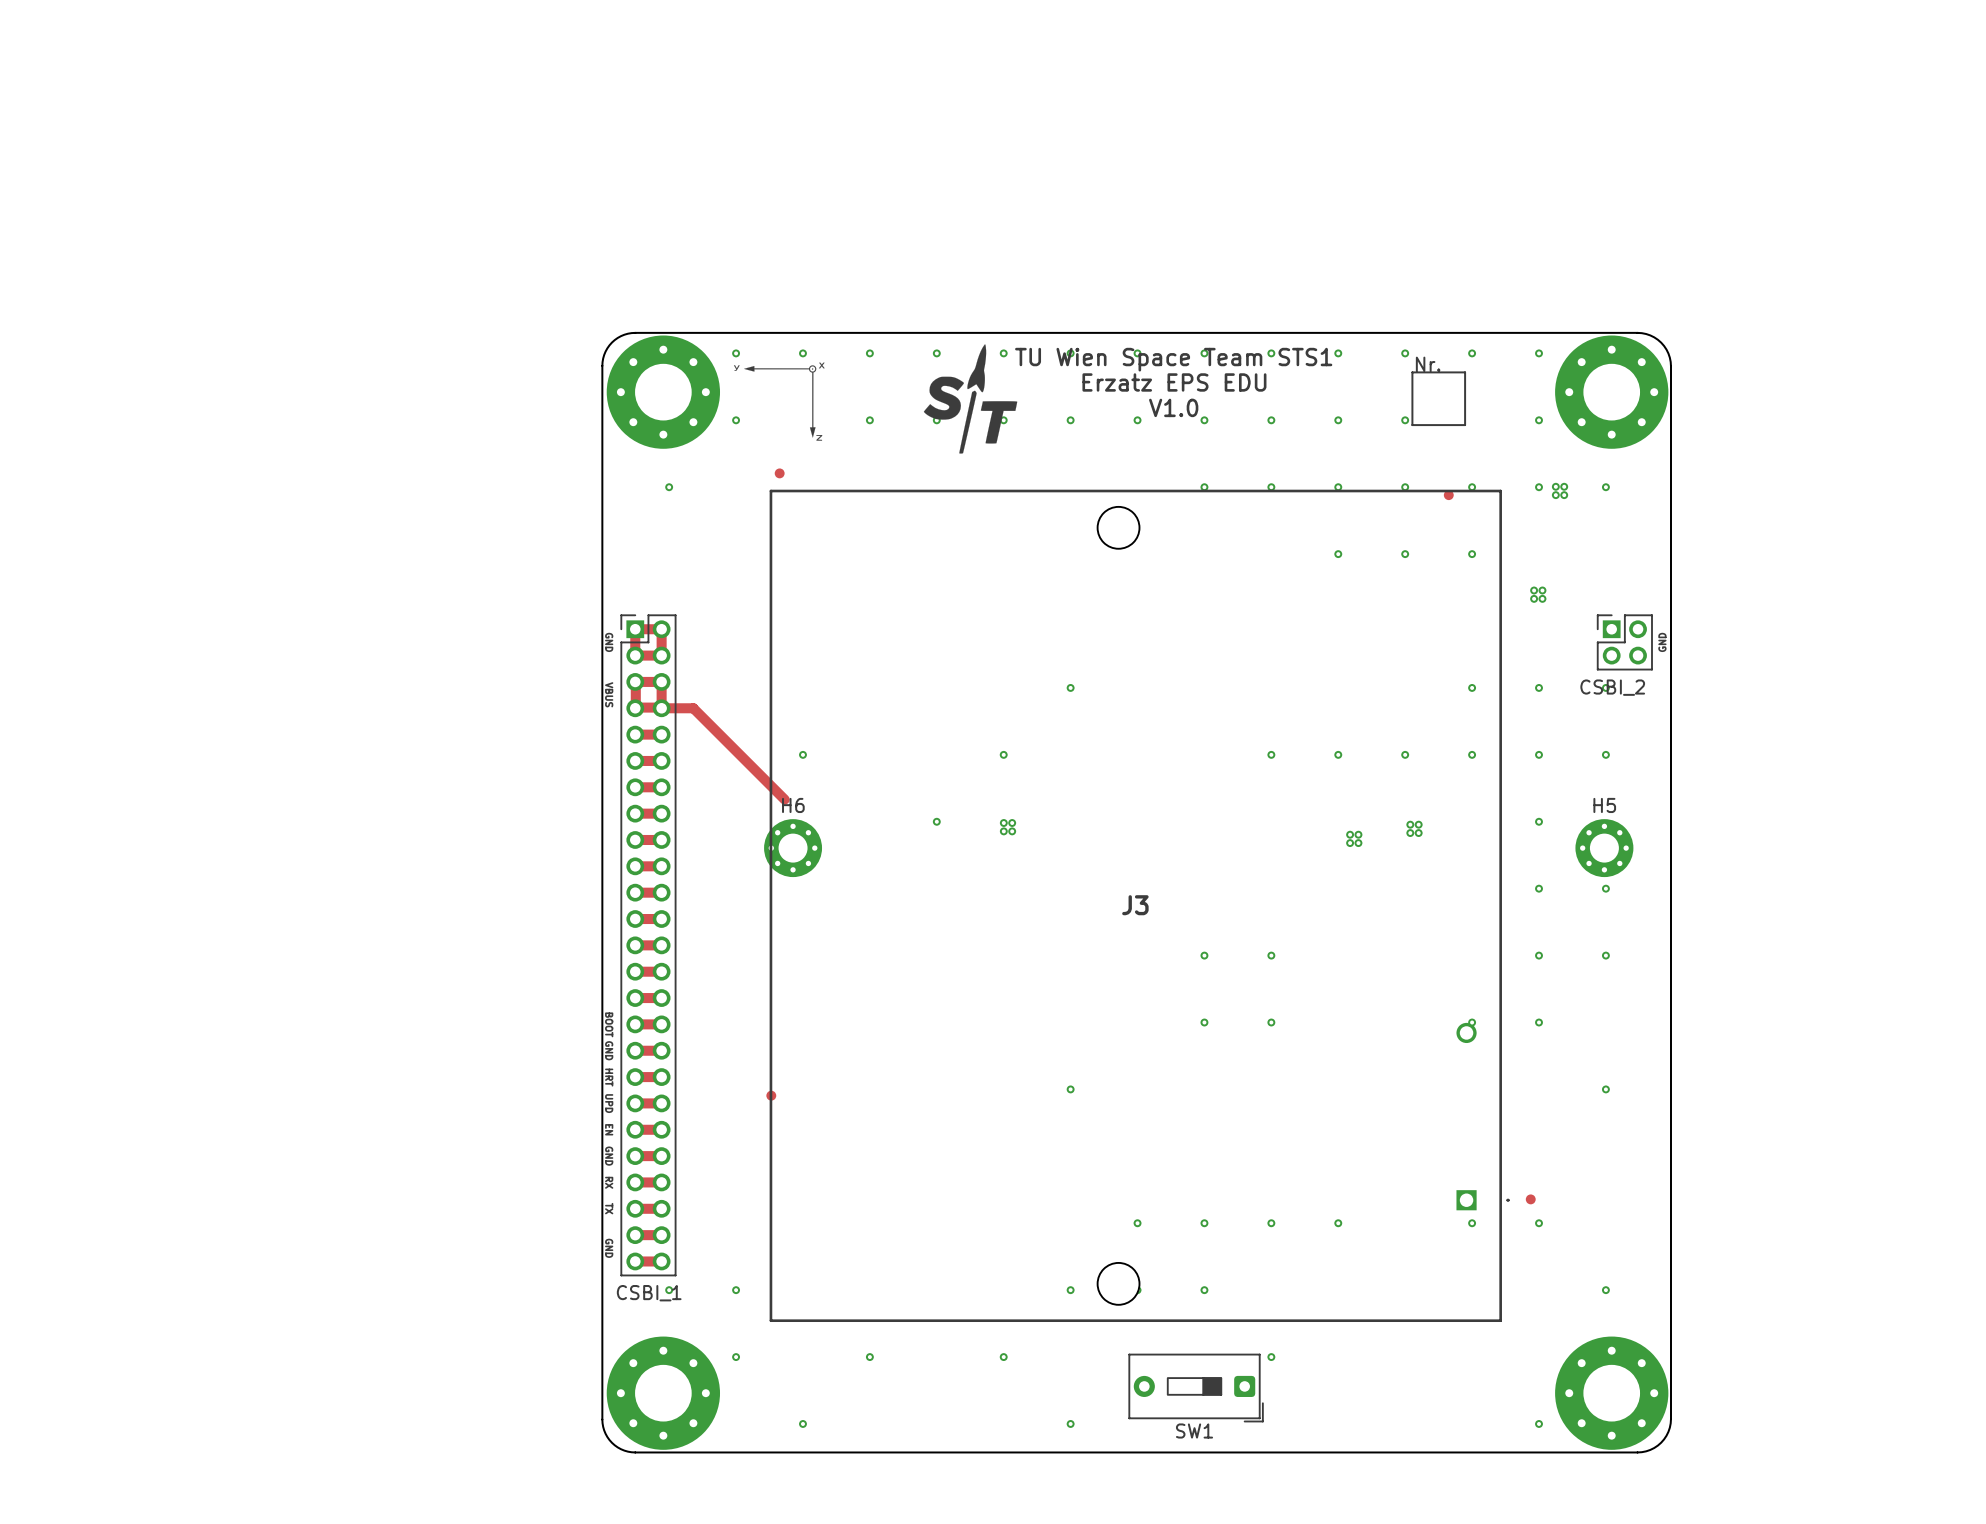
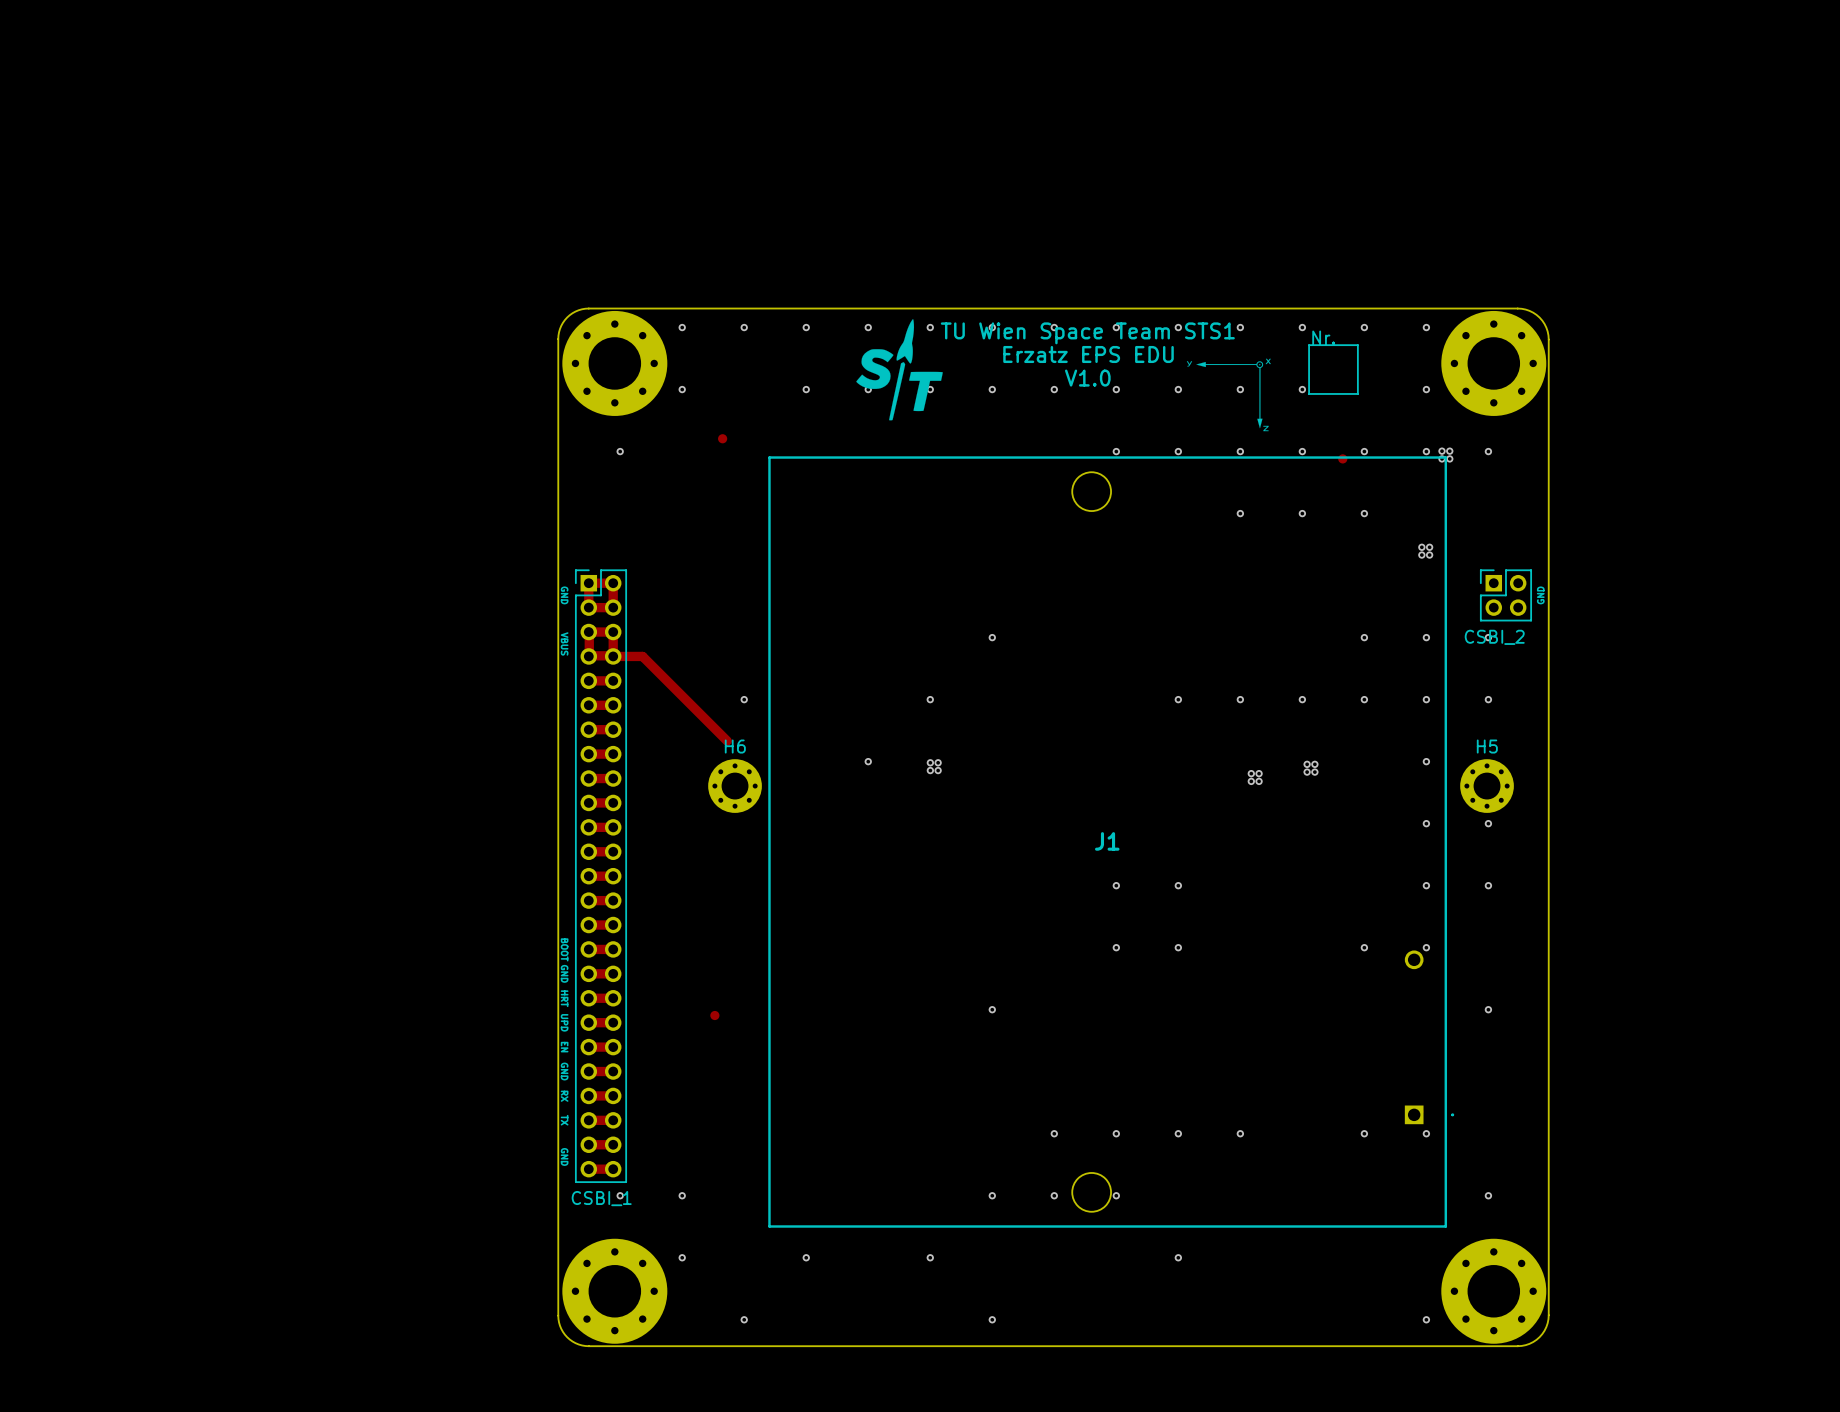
drawing: [733, 362, 825, 441] -> none
drawing: none -> [1186, 358, 1271, 432]
J3: (1139, 905) -> none
J1: none -> (1111, 842)
SW1: (1196, 1388) -> none

